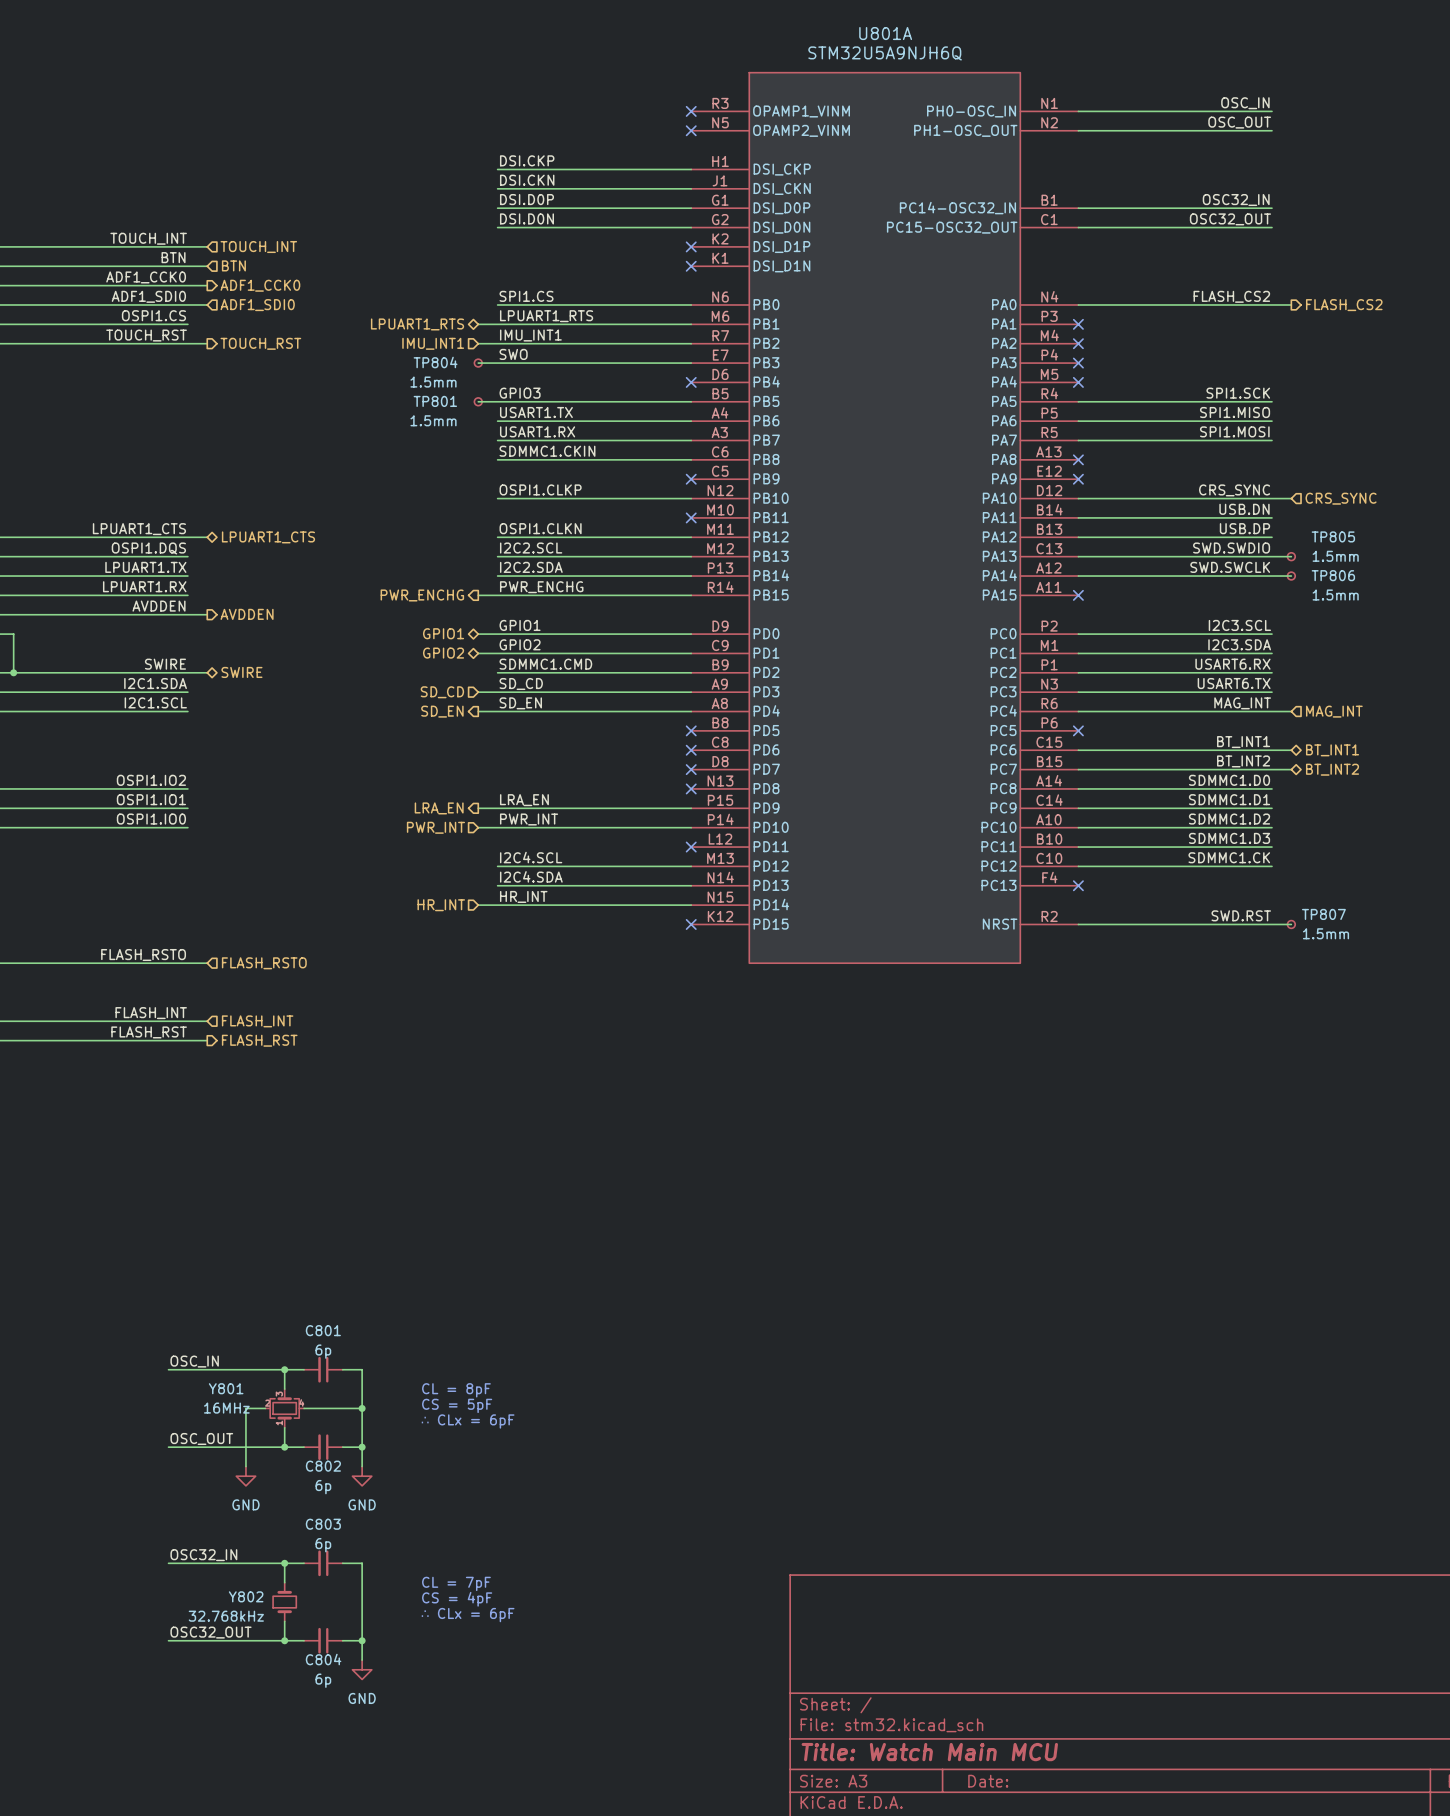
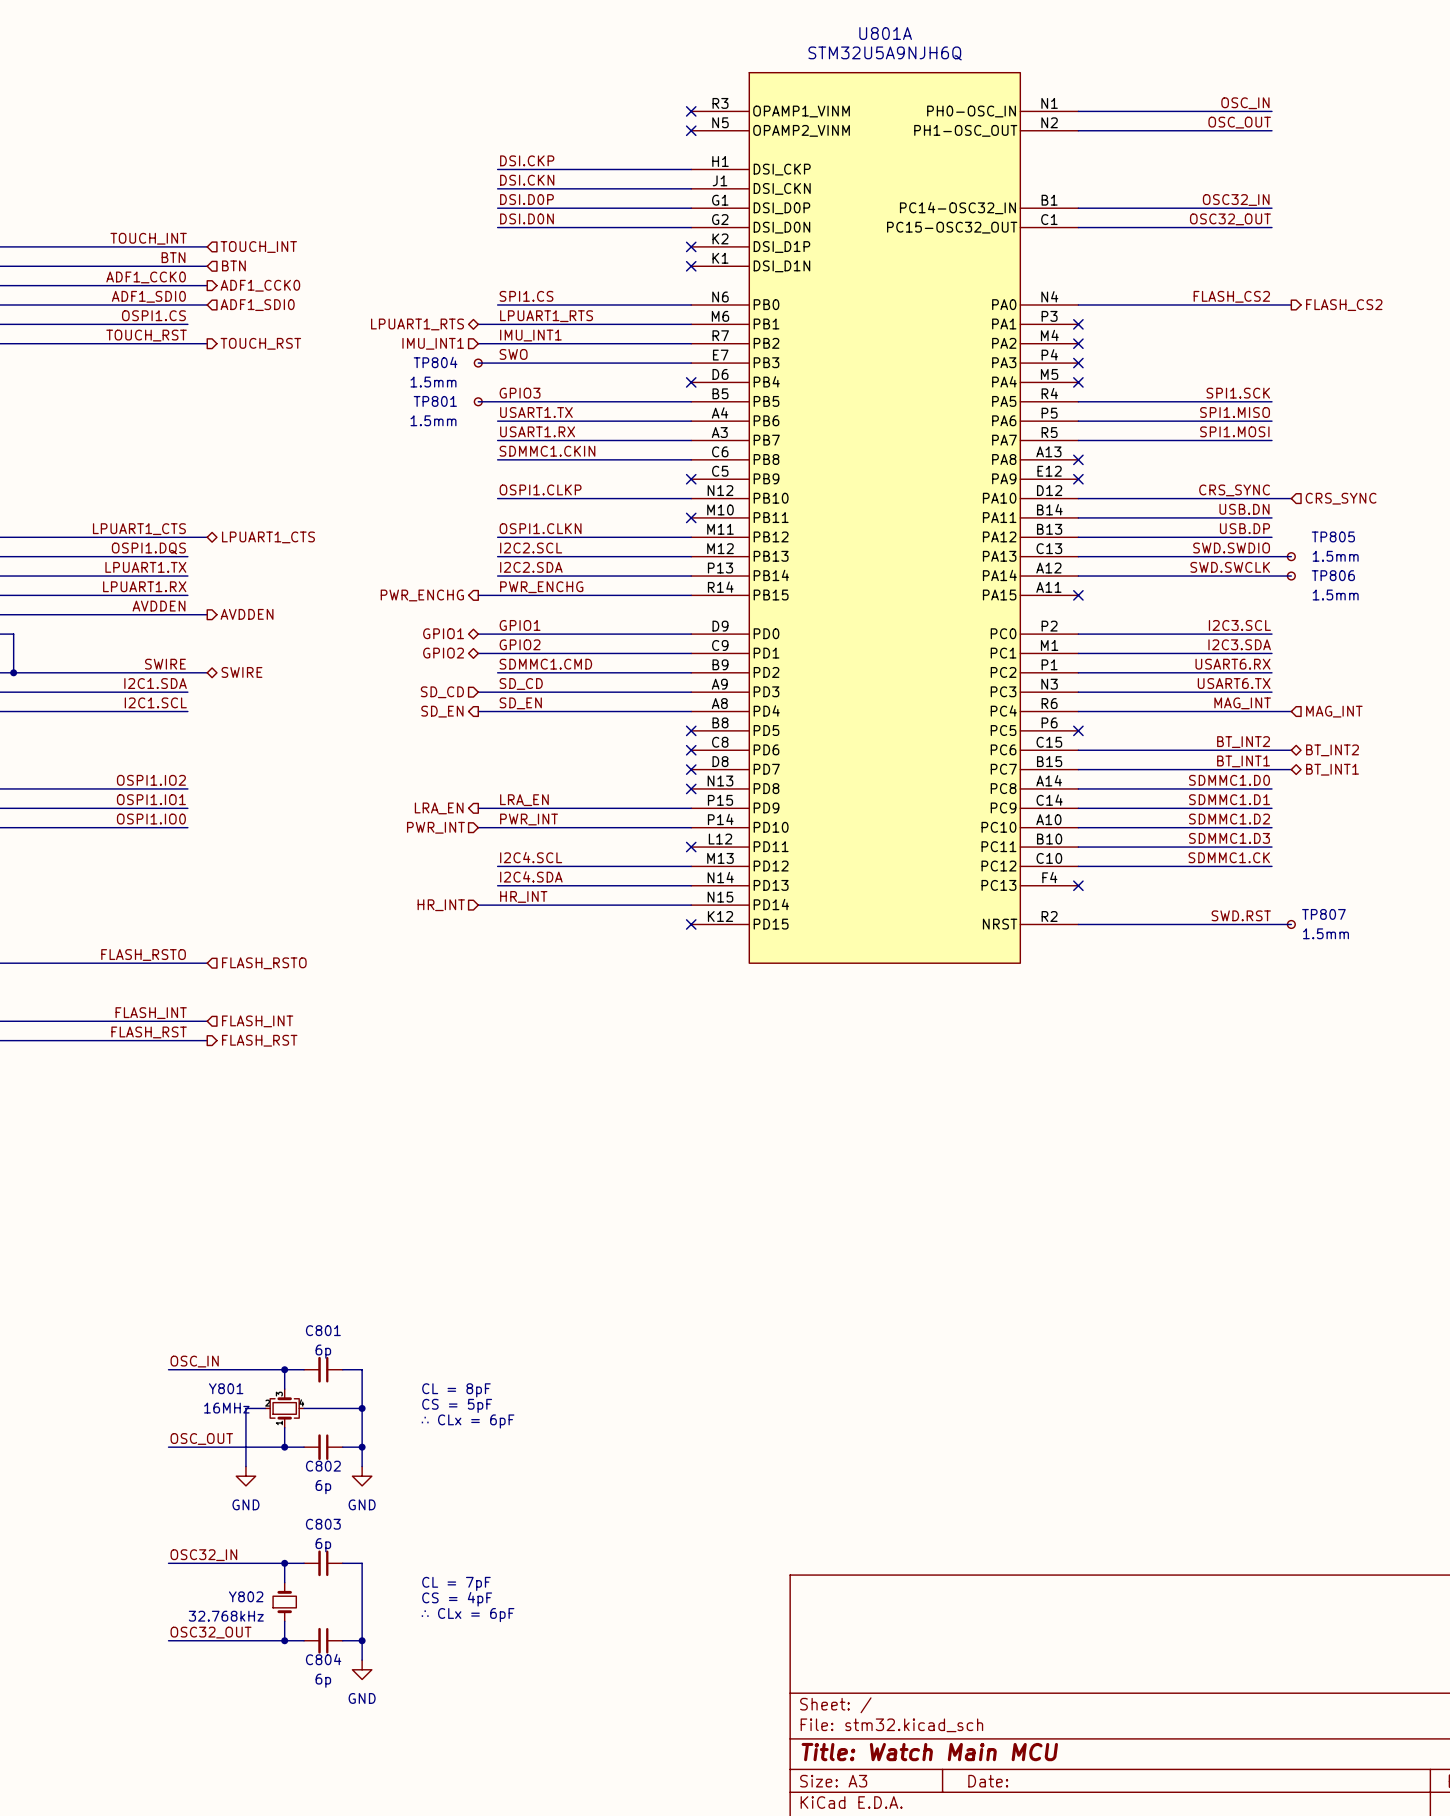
label: BT_INT1 (1243, 742) -> BT_INT2 (1243, 742)
hierarchical label: BT_INT1 (1332, 750) -> BT_INT2 (1332, 750)
label: BT_INT2 (1243, 761) -> BT_INT1 (1243, 761)
hierarchical label: BT_INT2 (1332, 769) -> BT_INT1 (1332, 769)

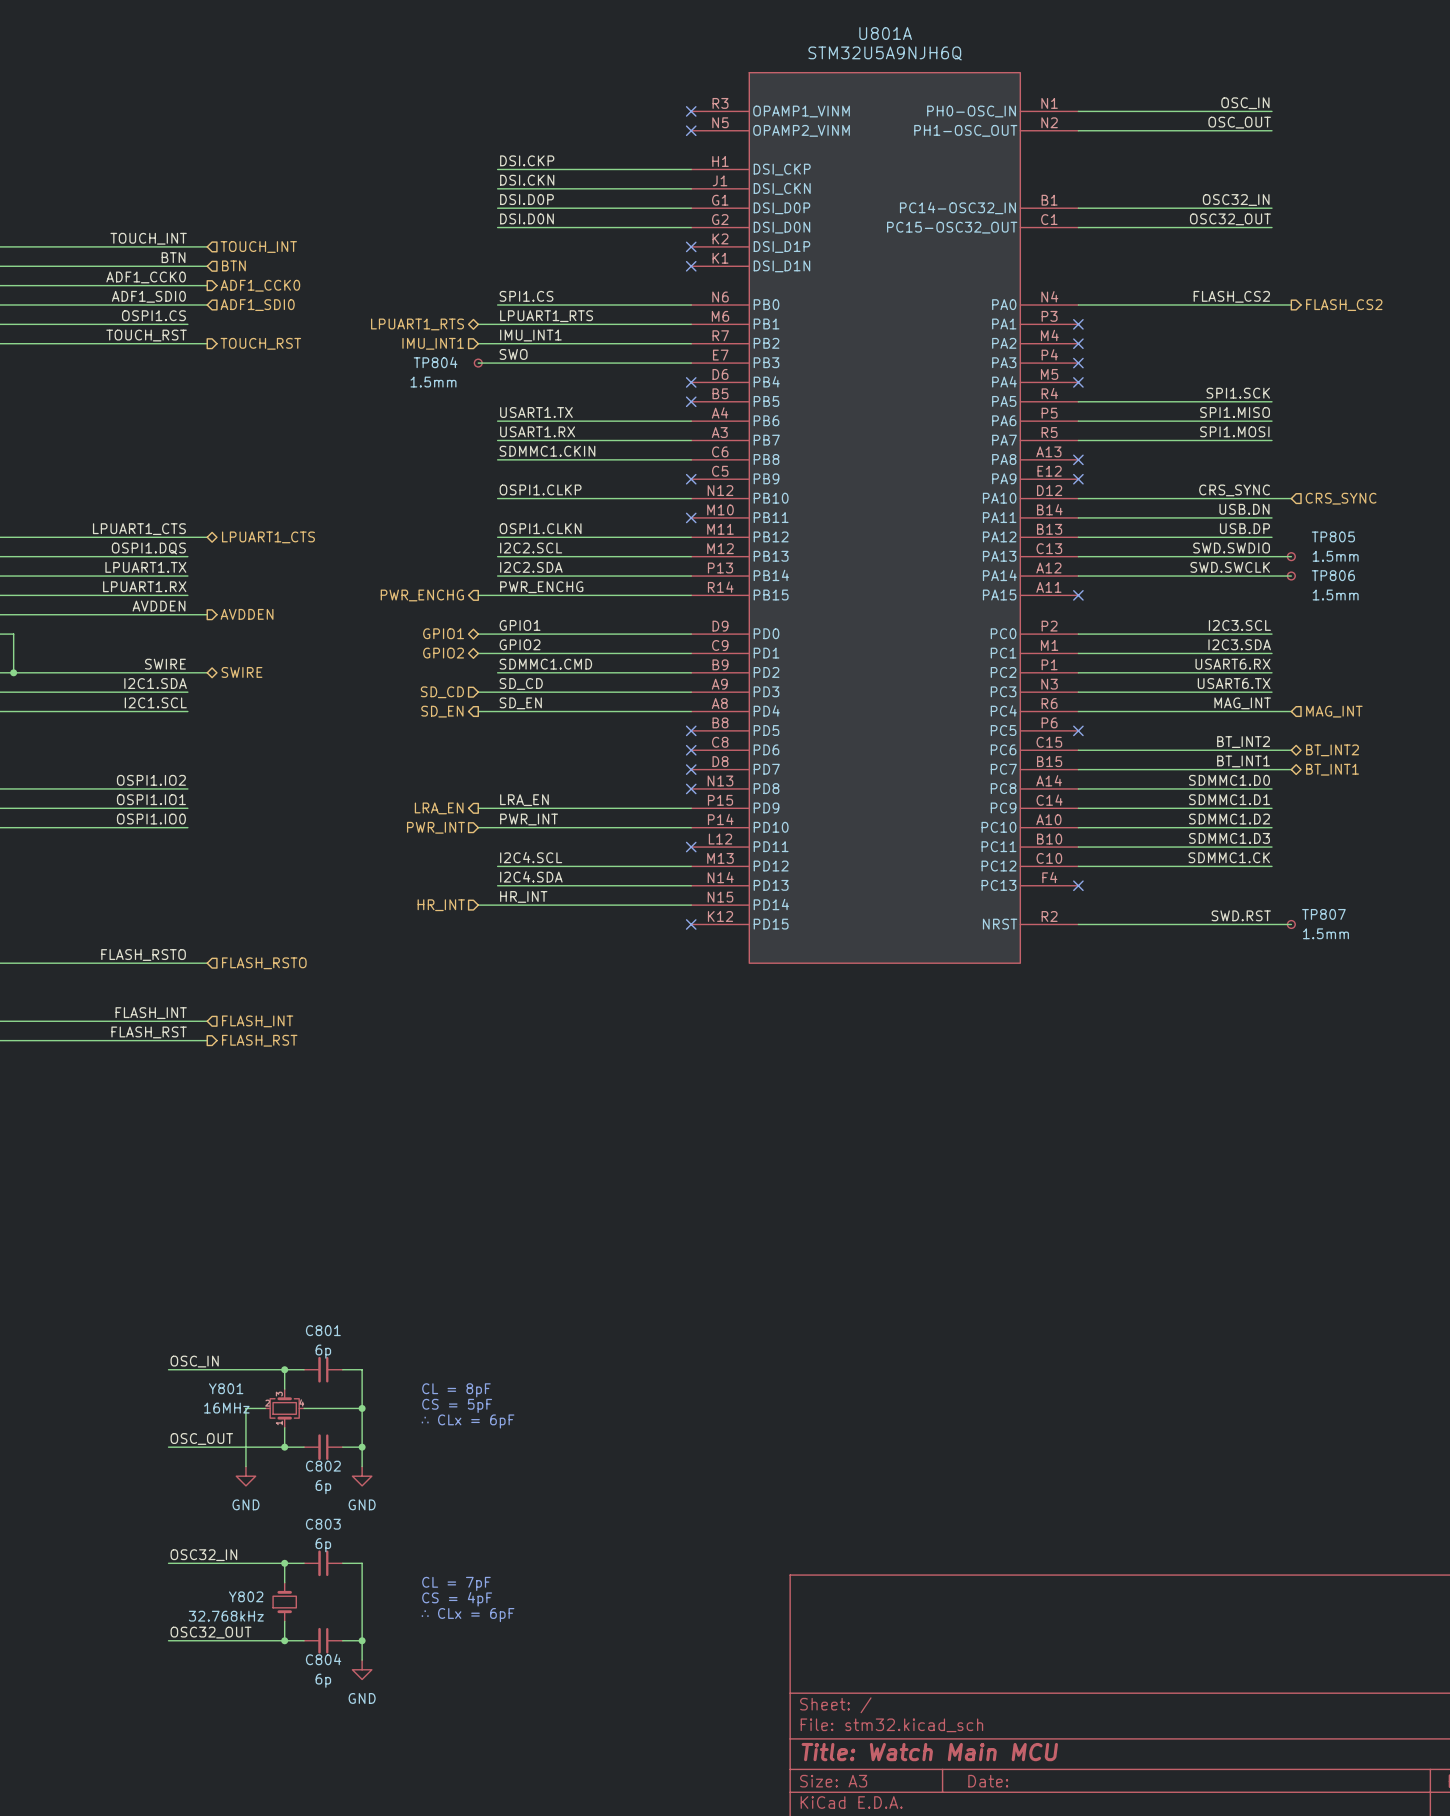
label: GPIO3 (520, 393) -> none
wire: (478, 401) (691, 401) -> none
TP801: 1.5mm (478, 401) -> none
no-connect mark: none -> (691, 401)

